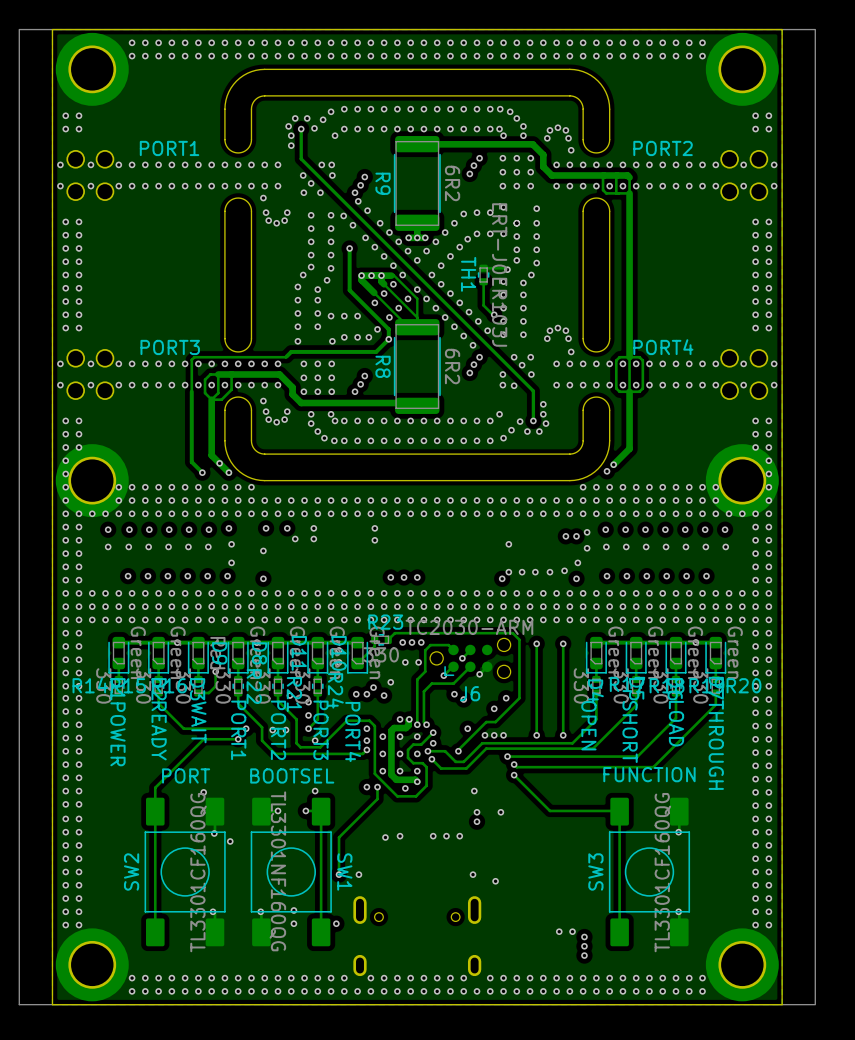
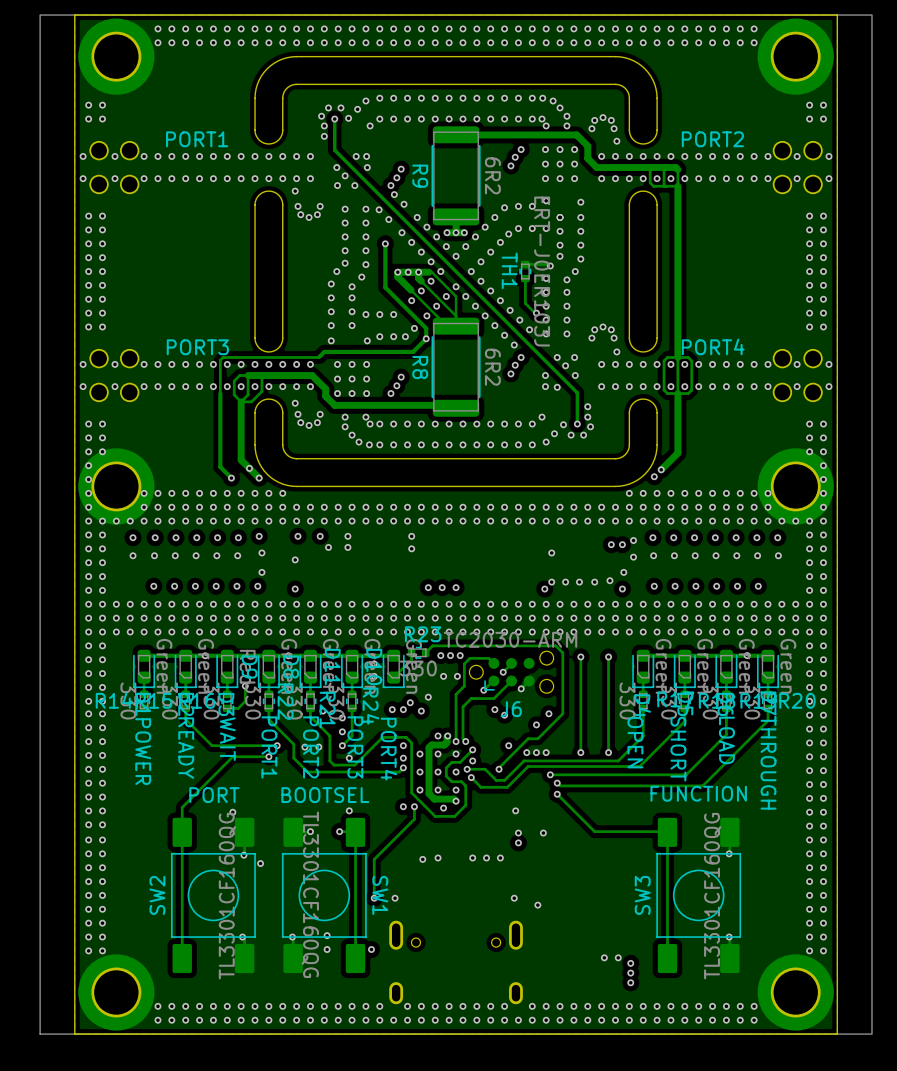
SW1 value: TL3301NF160QG (277, 871) -> TL3301CF160QG (310, 894)

